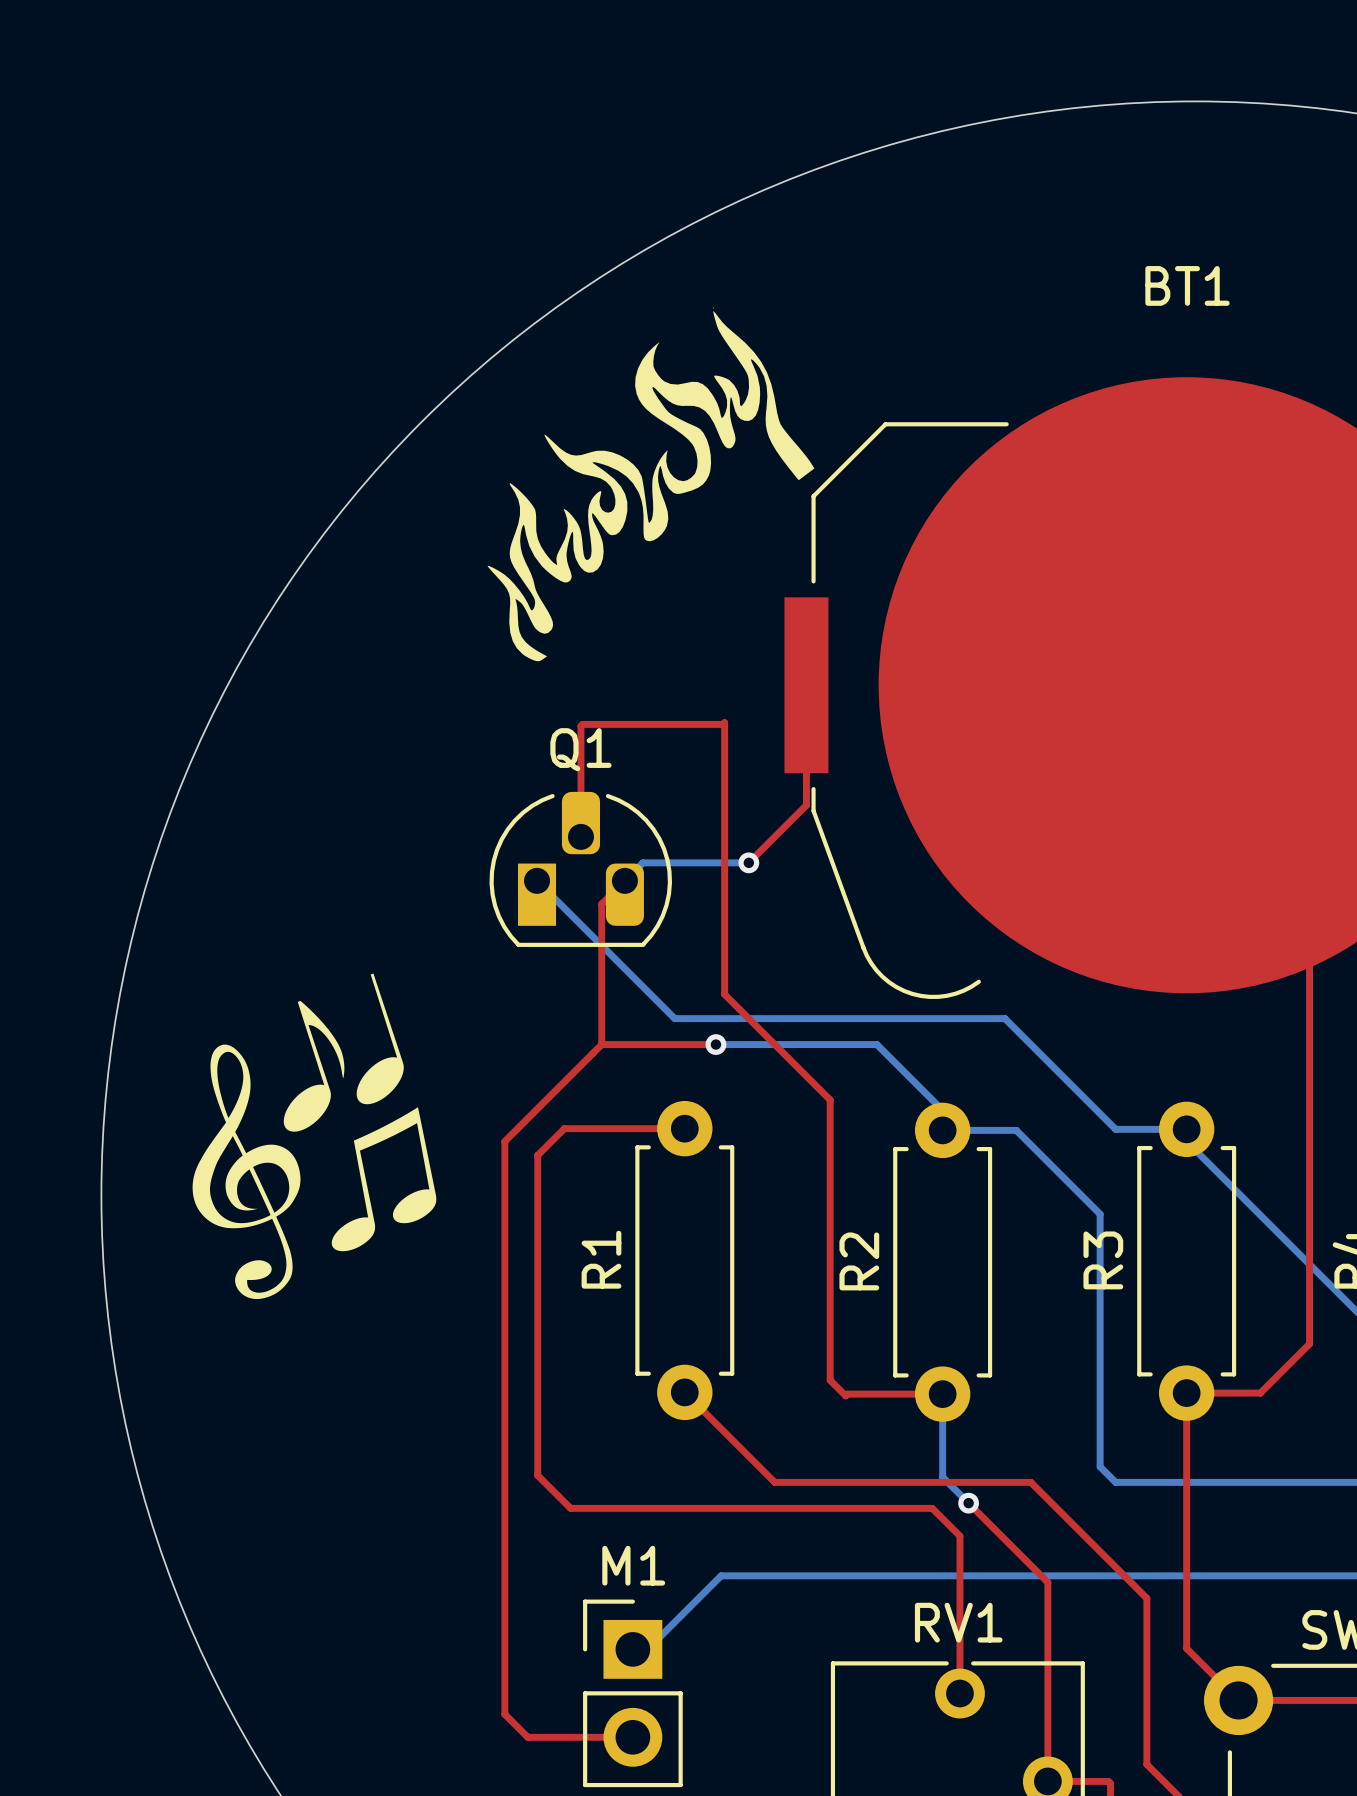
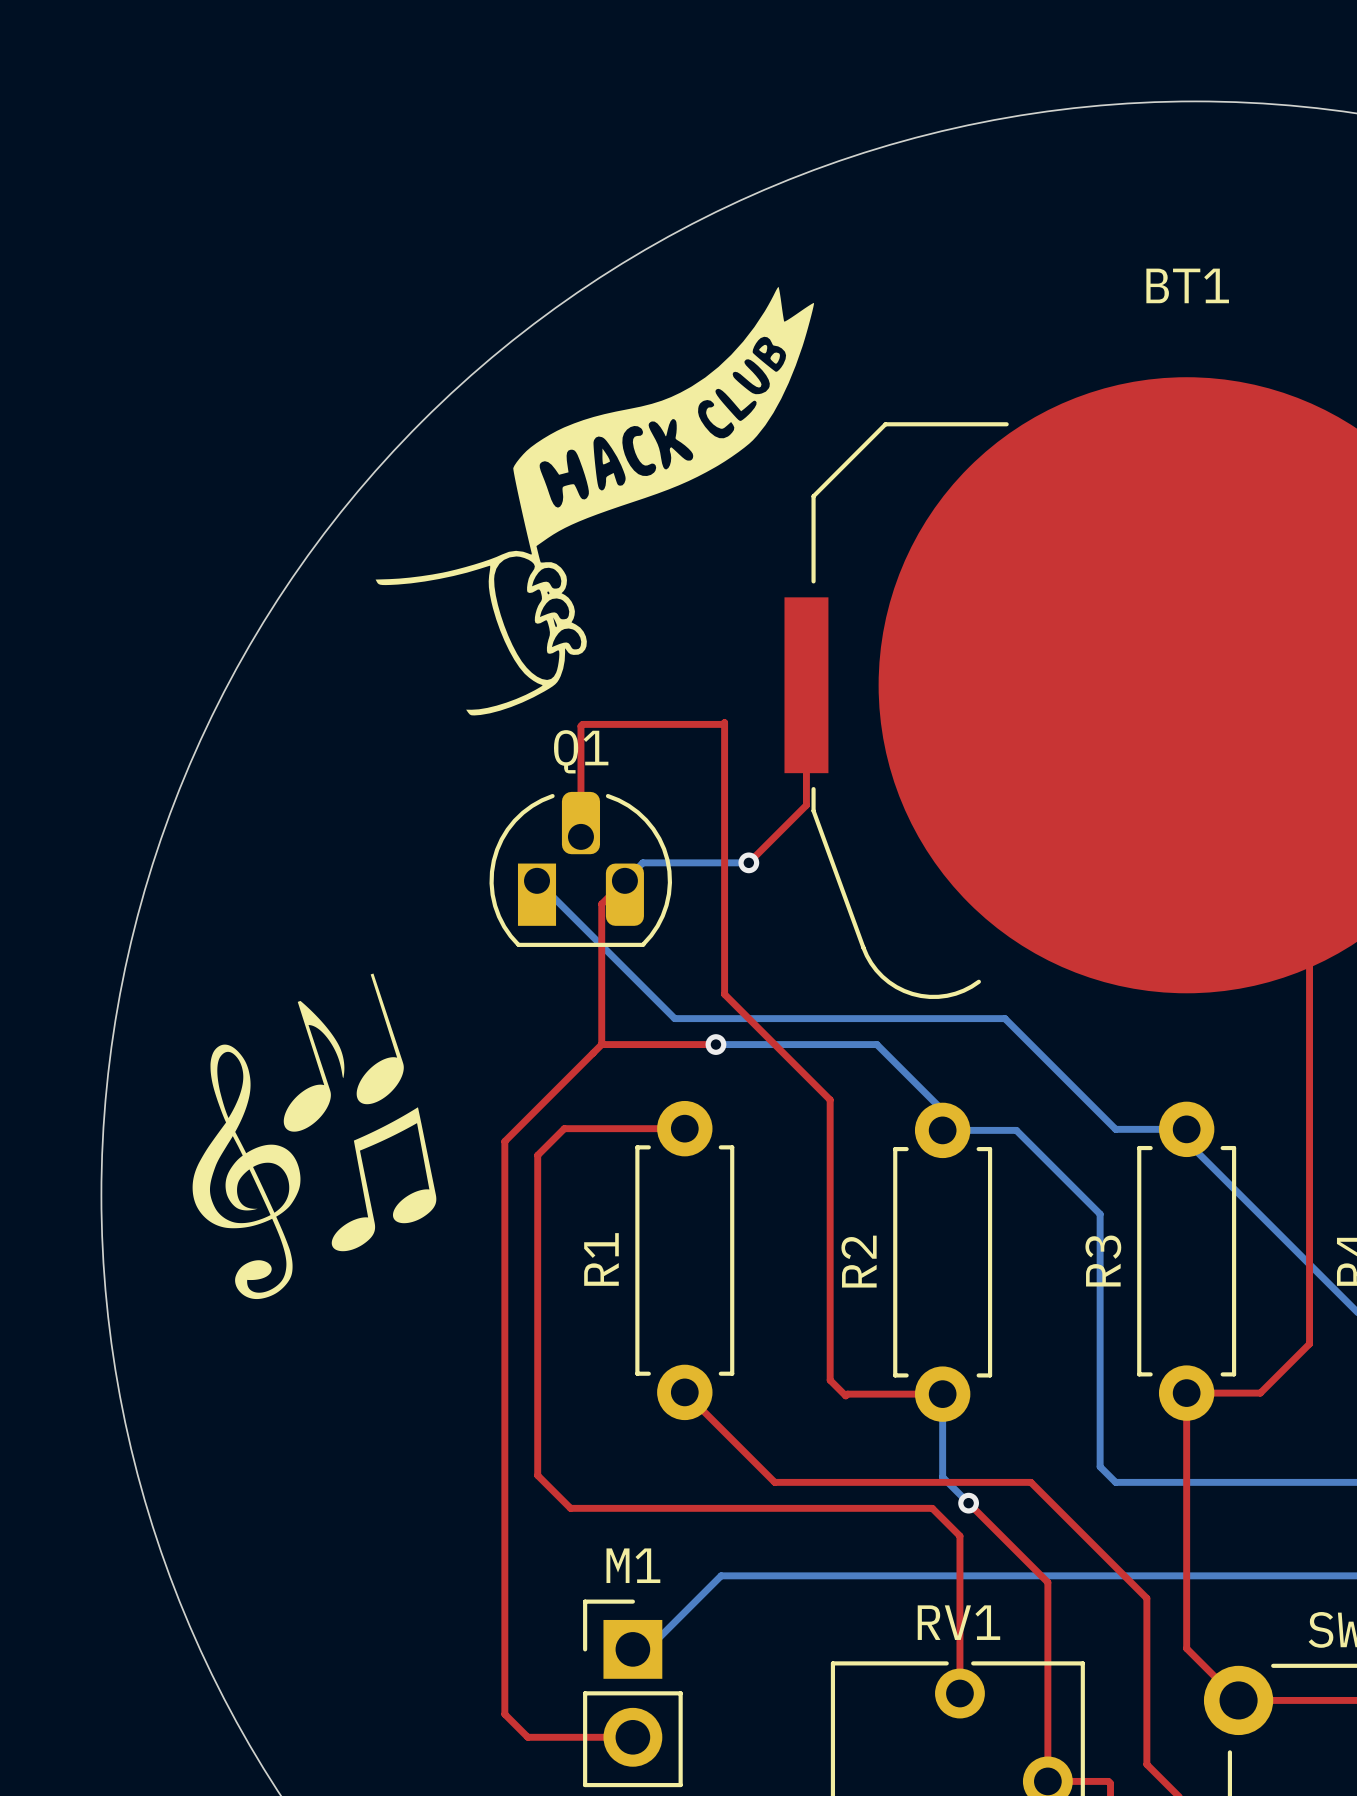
drawing: none -> [375, 286, 815, 716]
drawing: [487, 307, 815, 662] -> none

